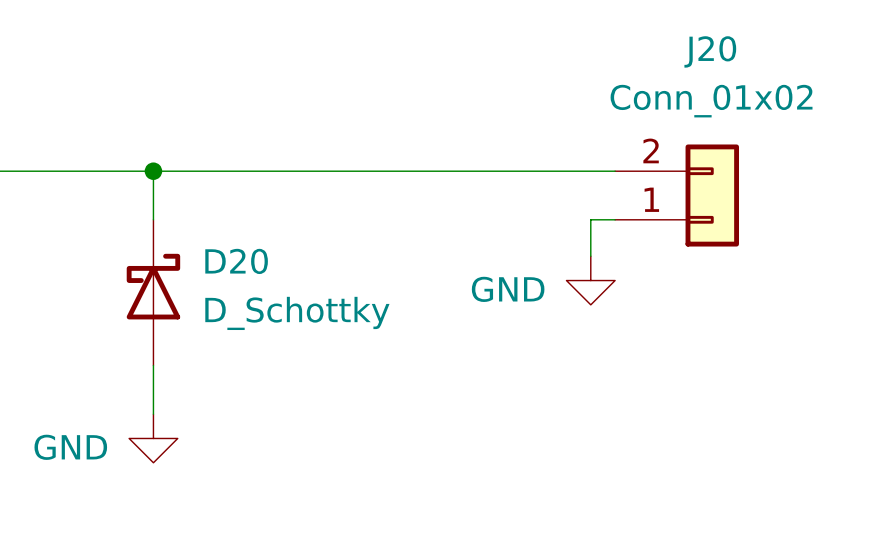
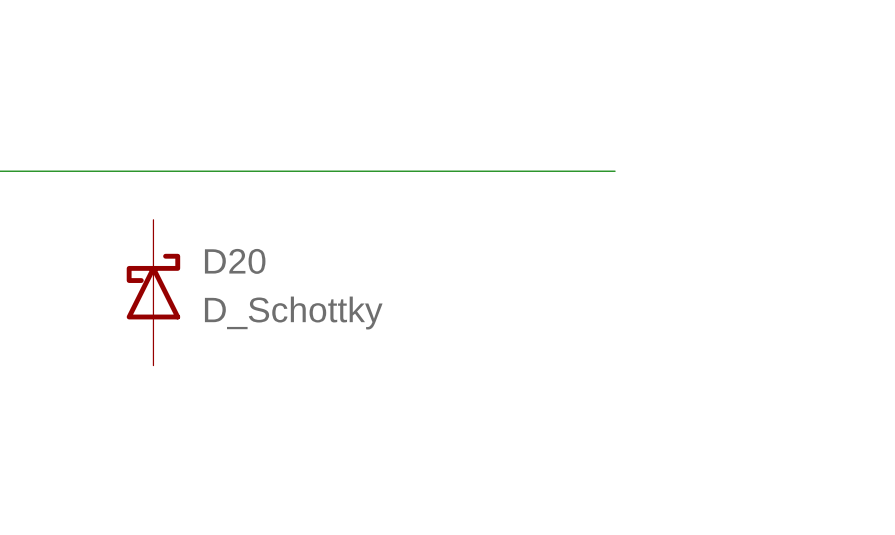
wire: (153, 171) (153, 219) -> none
junction: (153, 171) -> none
J20: Conn_01x02 (677, 195) -> none
wire: (615, 219) (590, 219) (590, 256) -> none
power symbol: GND (590, 280) -> none
wire: (153, 365) (153, 414) -> none
power symbol: GND (153, 438) -> none

